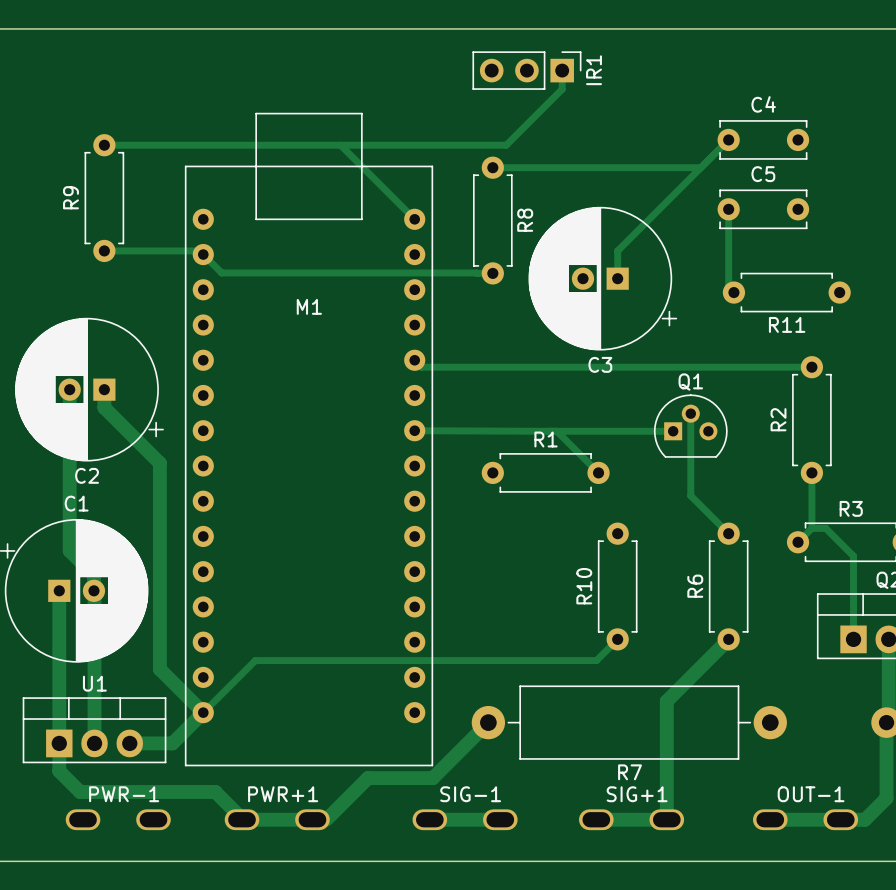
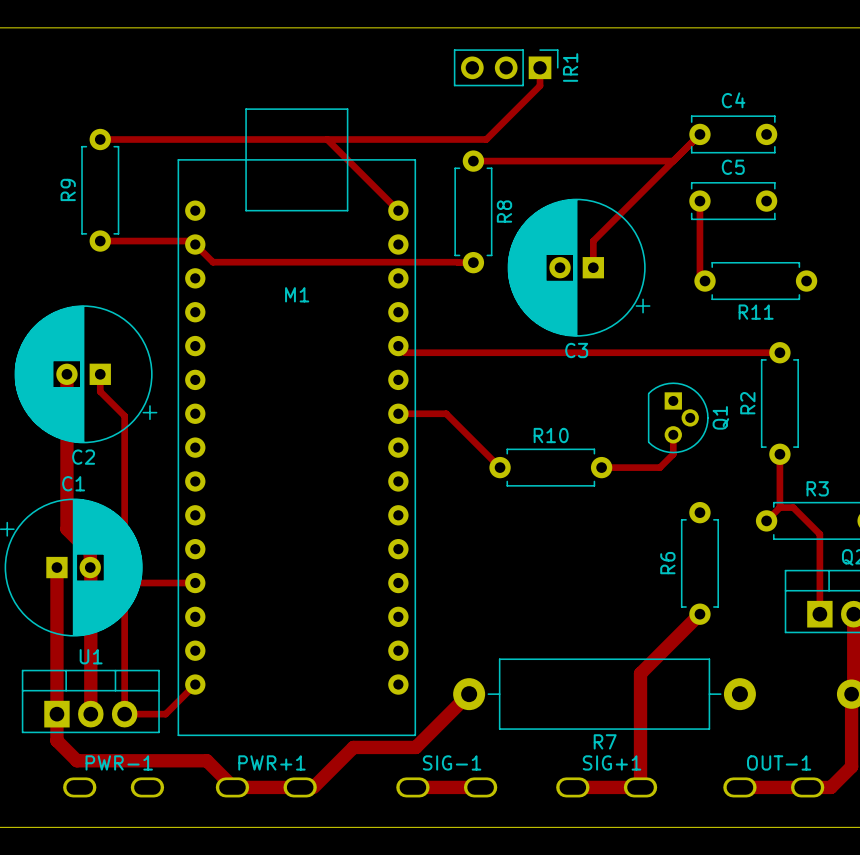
track width: thick (104, 389) (104, 407) (129, 433) -> thin (100, 374) (100, 391) (124, 416)
track: (690, 413) (690, 495) (728, 533) -> none
Q1 rotation: 0° (690, 426) -> 90° clockwise (678, 417)
track: (414, 430) (673, 431) -> (398, 413) (446, 413) (500, 467)
track: (556, 431) (598, 472) -> none
track: (129, 433) (159, 463) (159, 669) (203, 712) (255, 660) (596, 660) (617, 639) -> (124, 416) (124, 714)
track: none -> (673, 434) (673, 454) (659, 467) (601, 467)
R1: (545, 472) -> none
R10 rotation: 0° (617, 586) -> 90° clockwise (550, 467)
R10 position: (617, 586) -> (550, 467)
track: none -> (195, 583) (126, 583) (124, 585)
track width: thick (203, 712) (172, 743) (129, 743) -> thin (195, 684) (165, 714) (124, 714)

